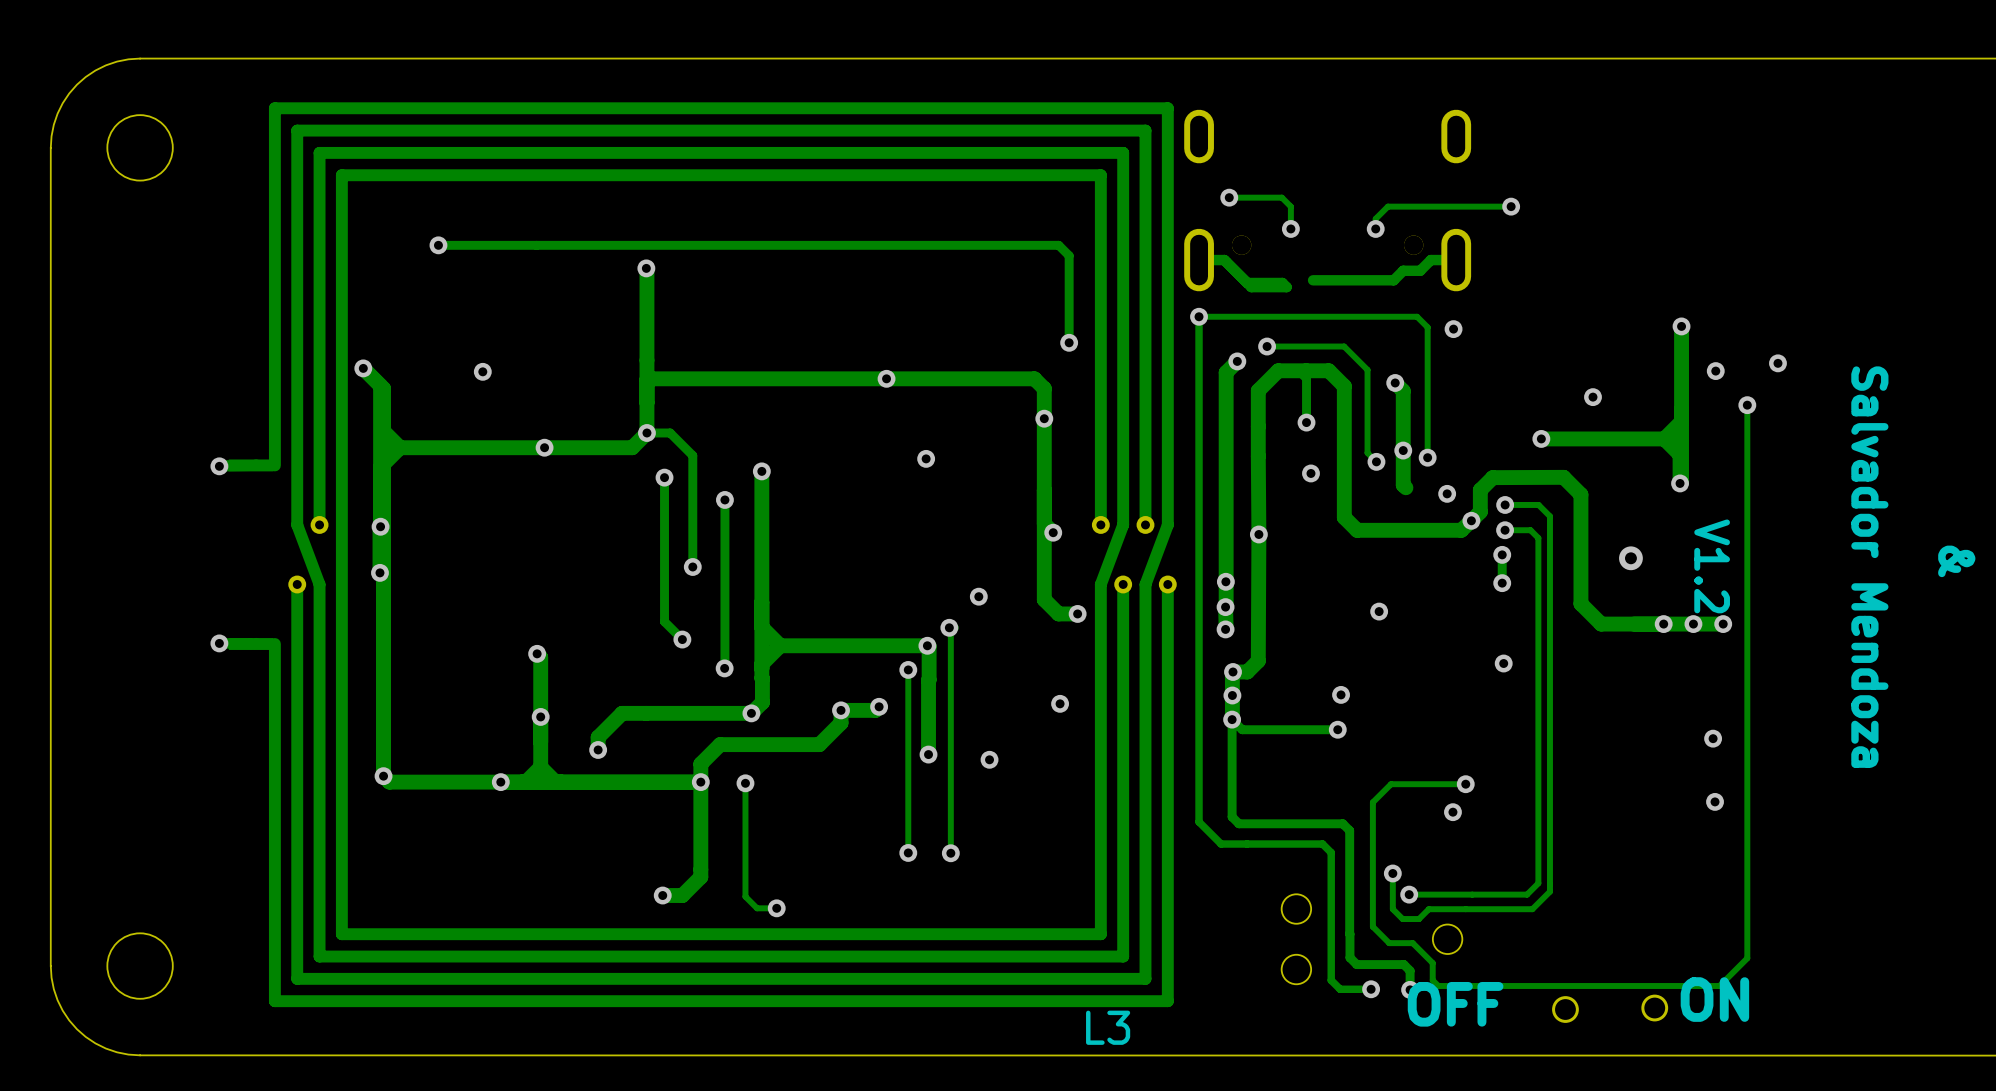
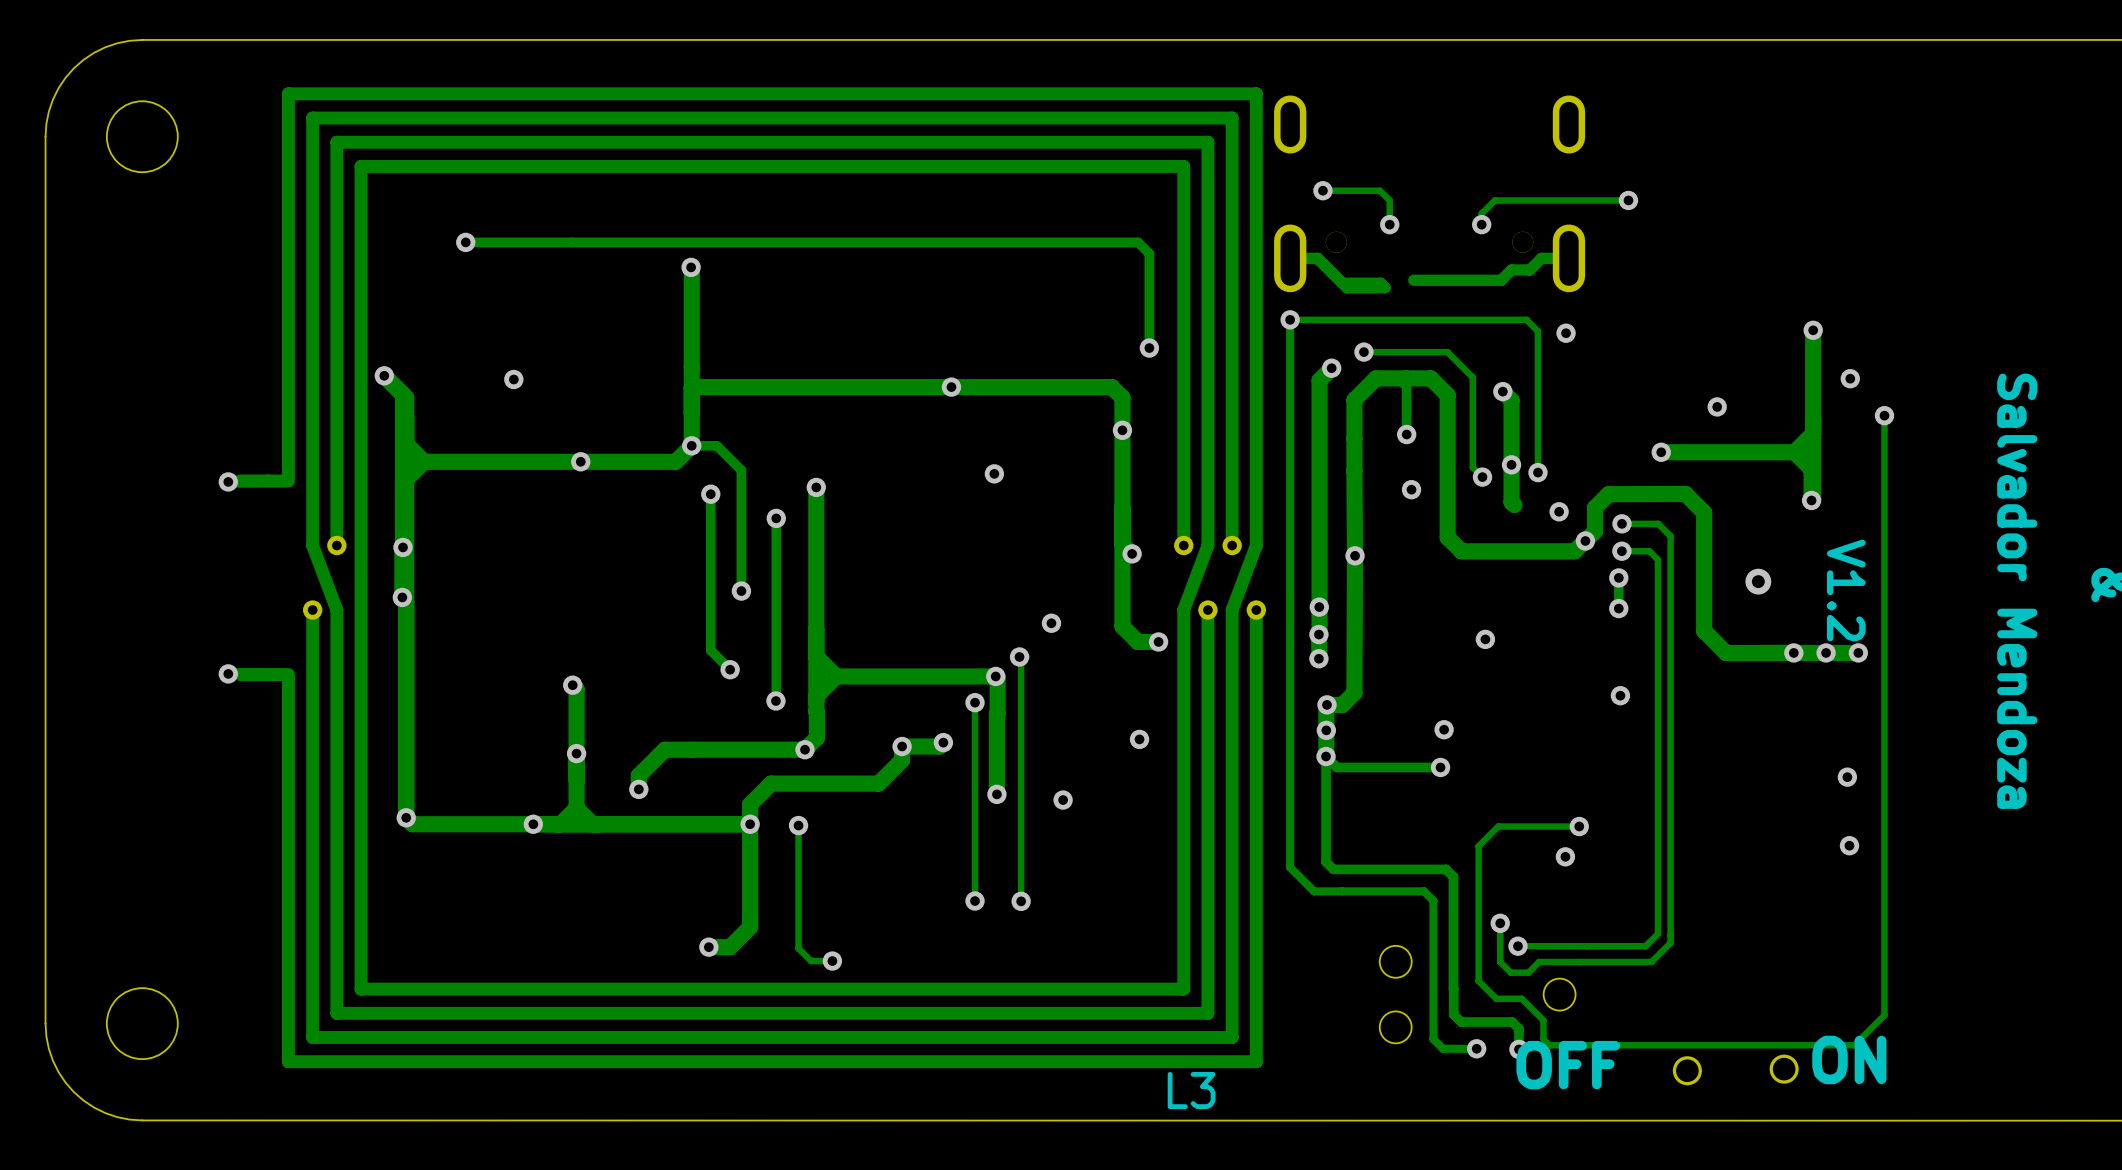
via: (1777, 363) -> none

